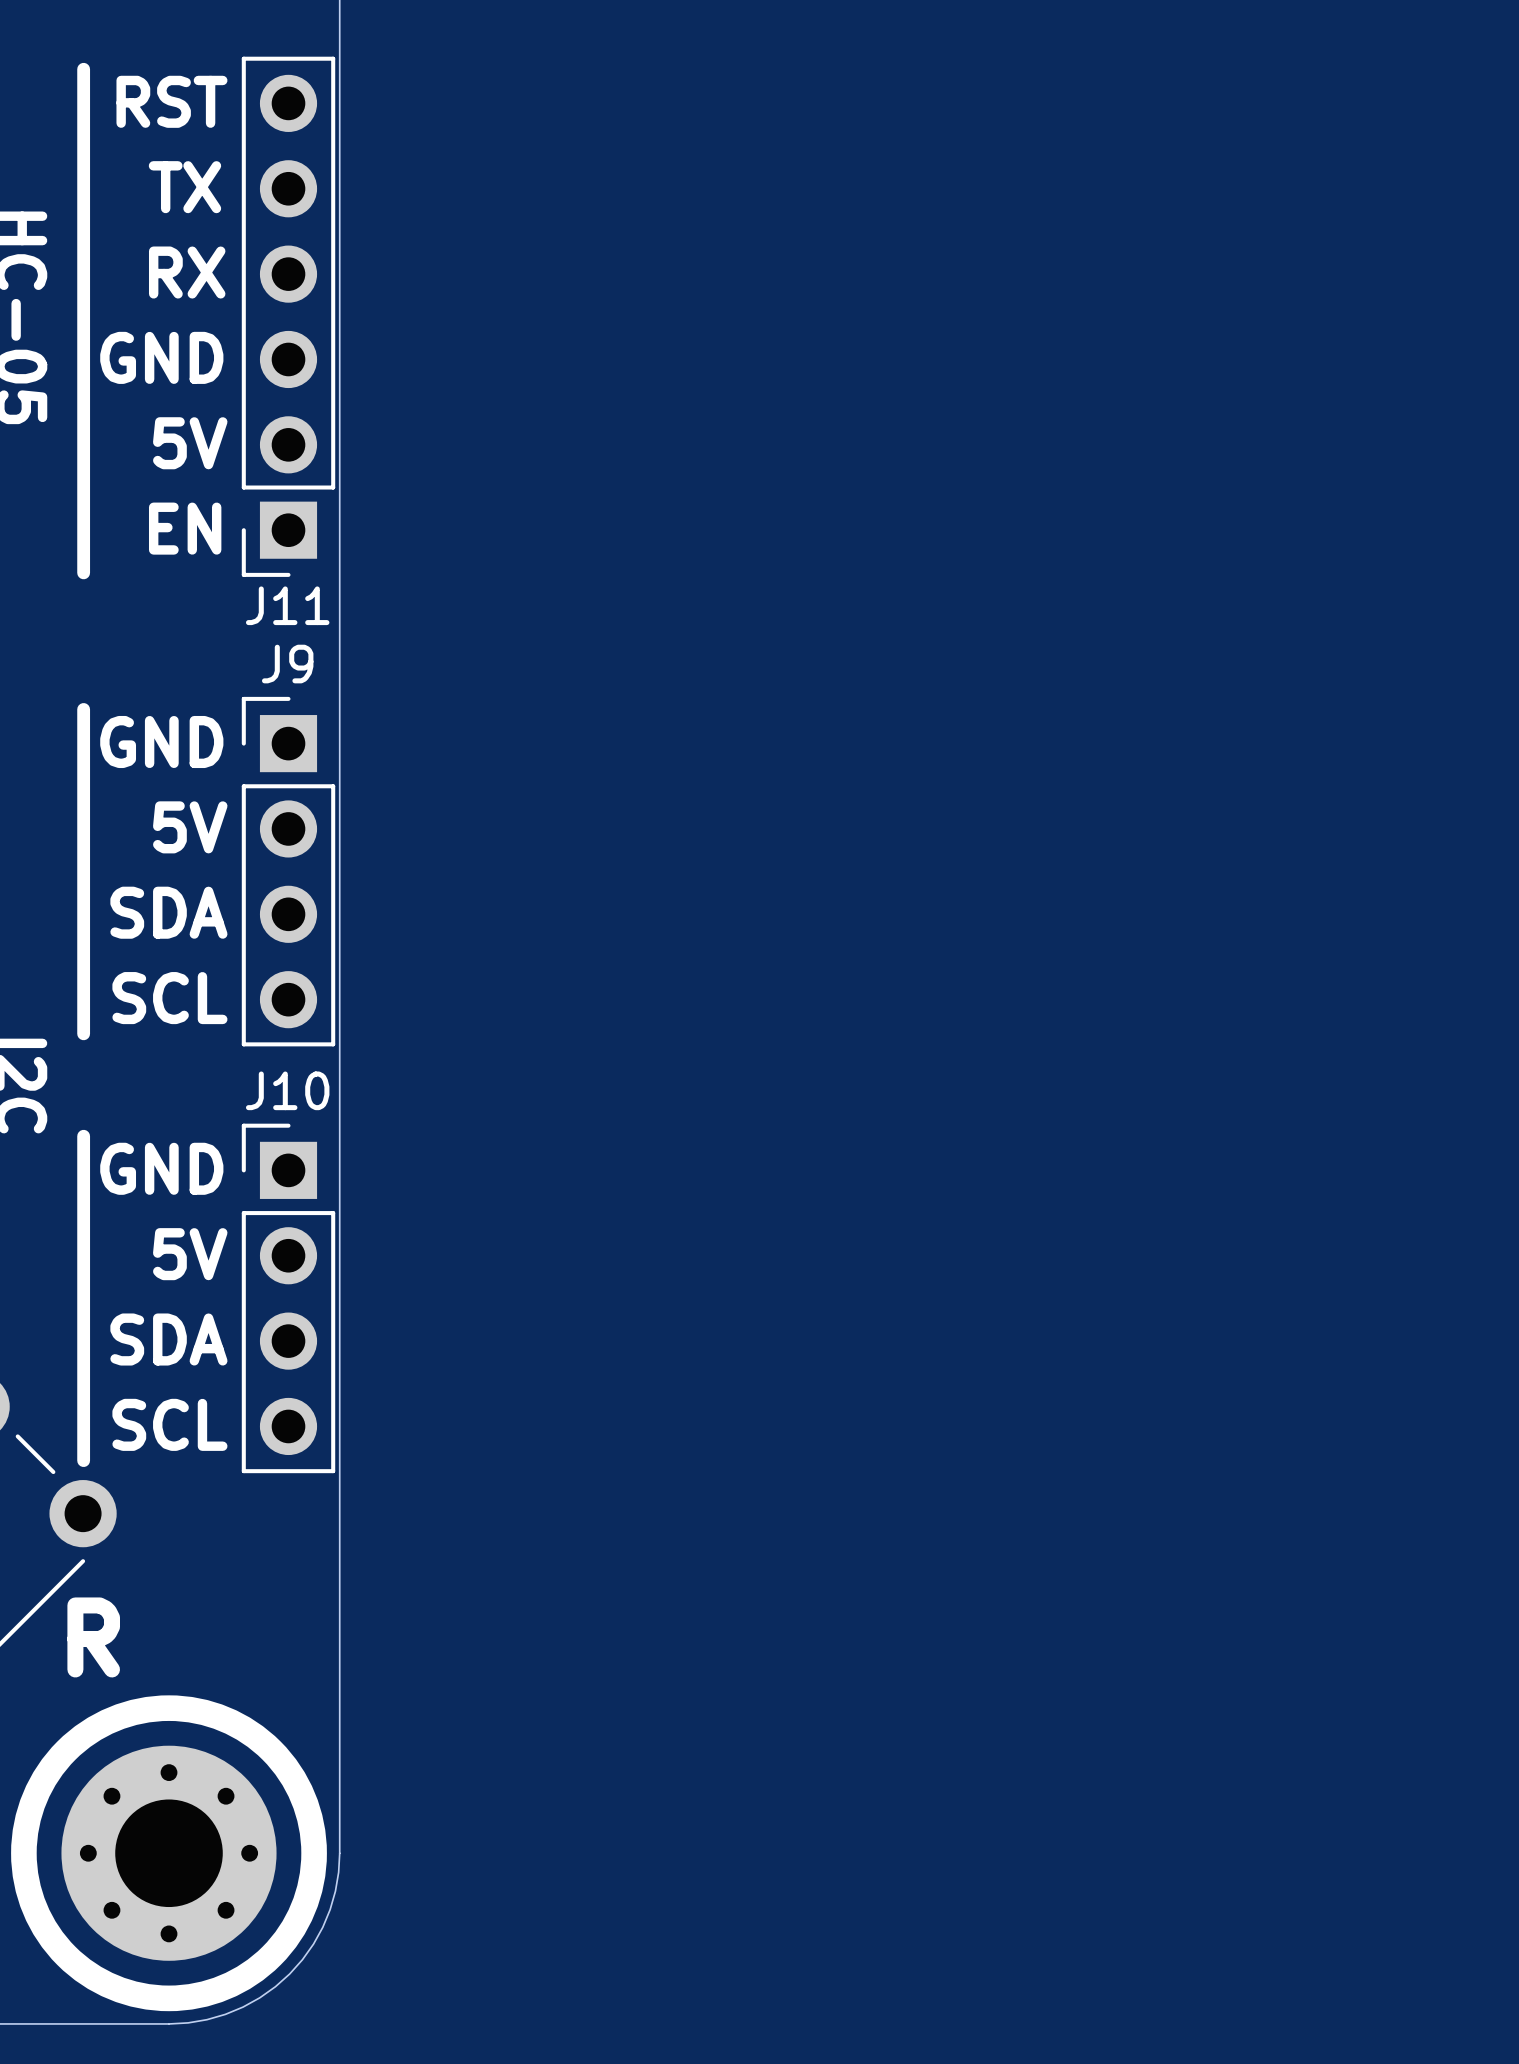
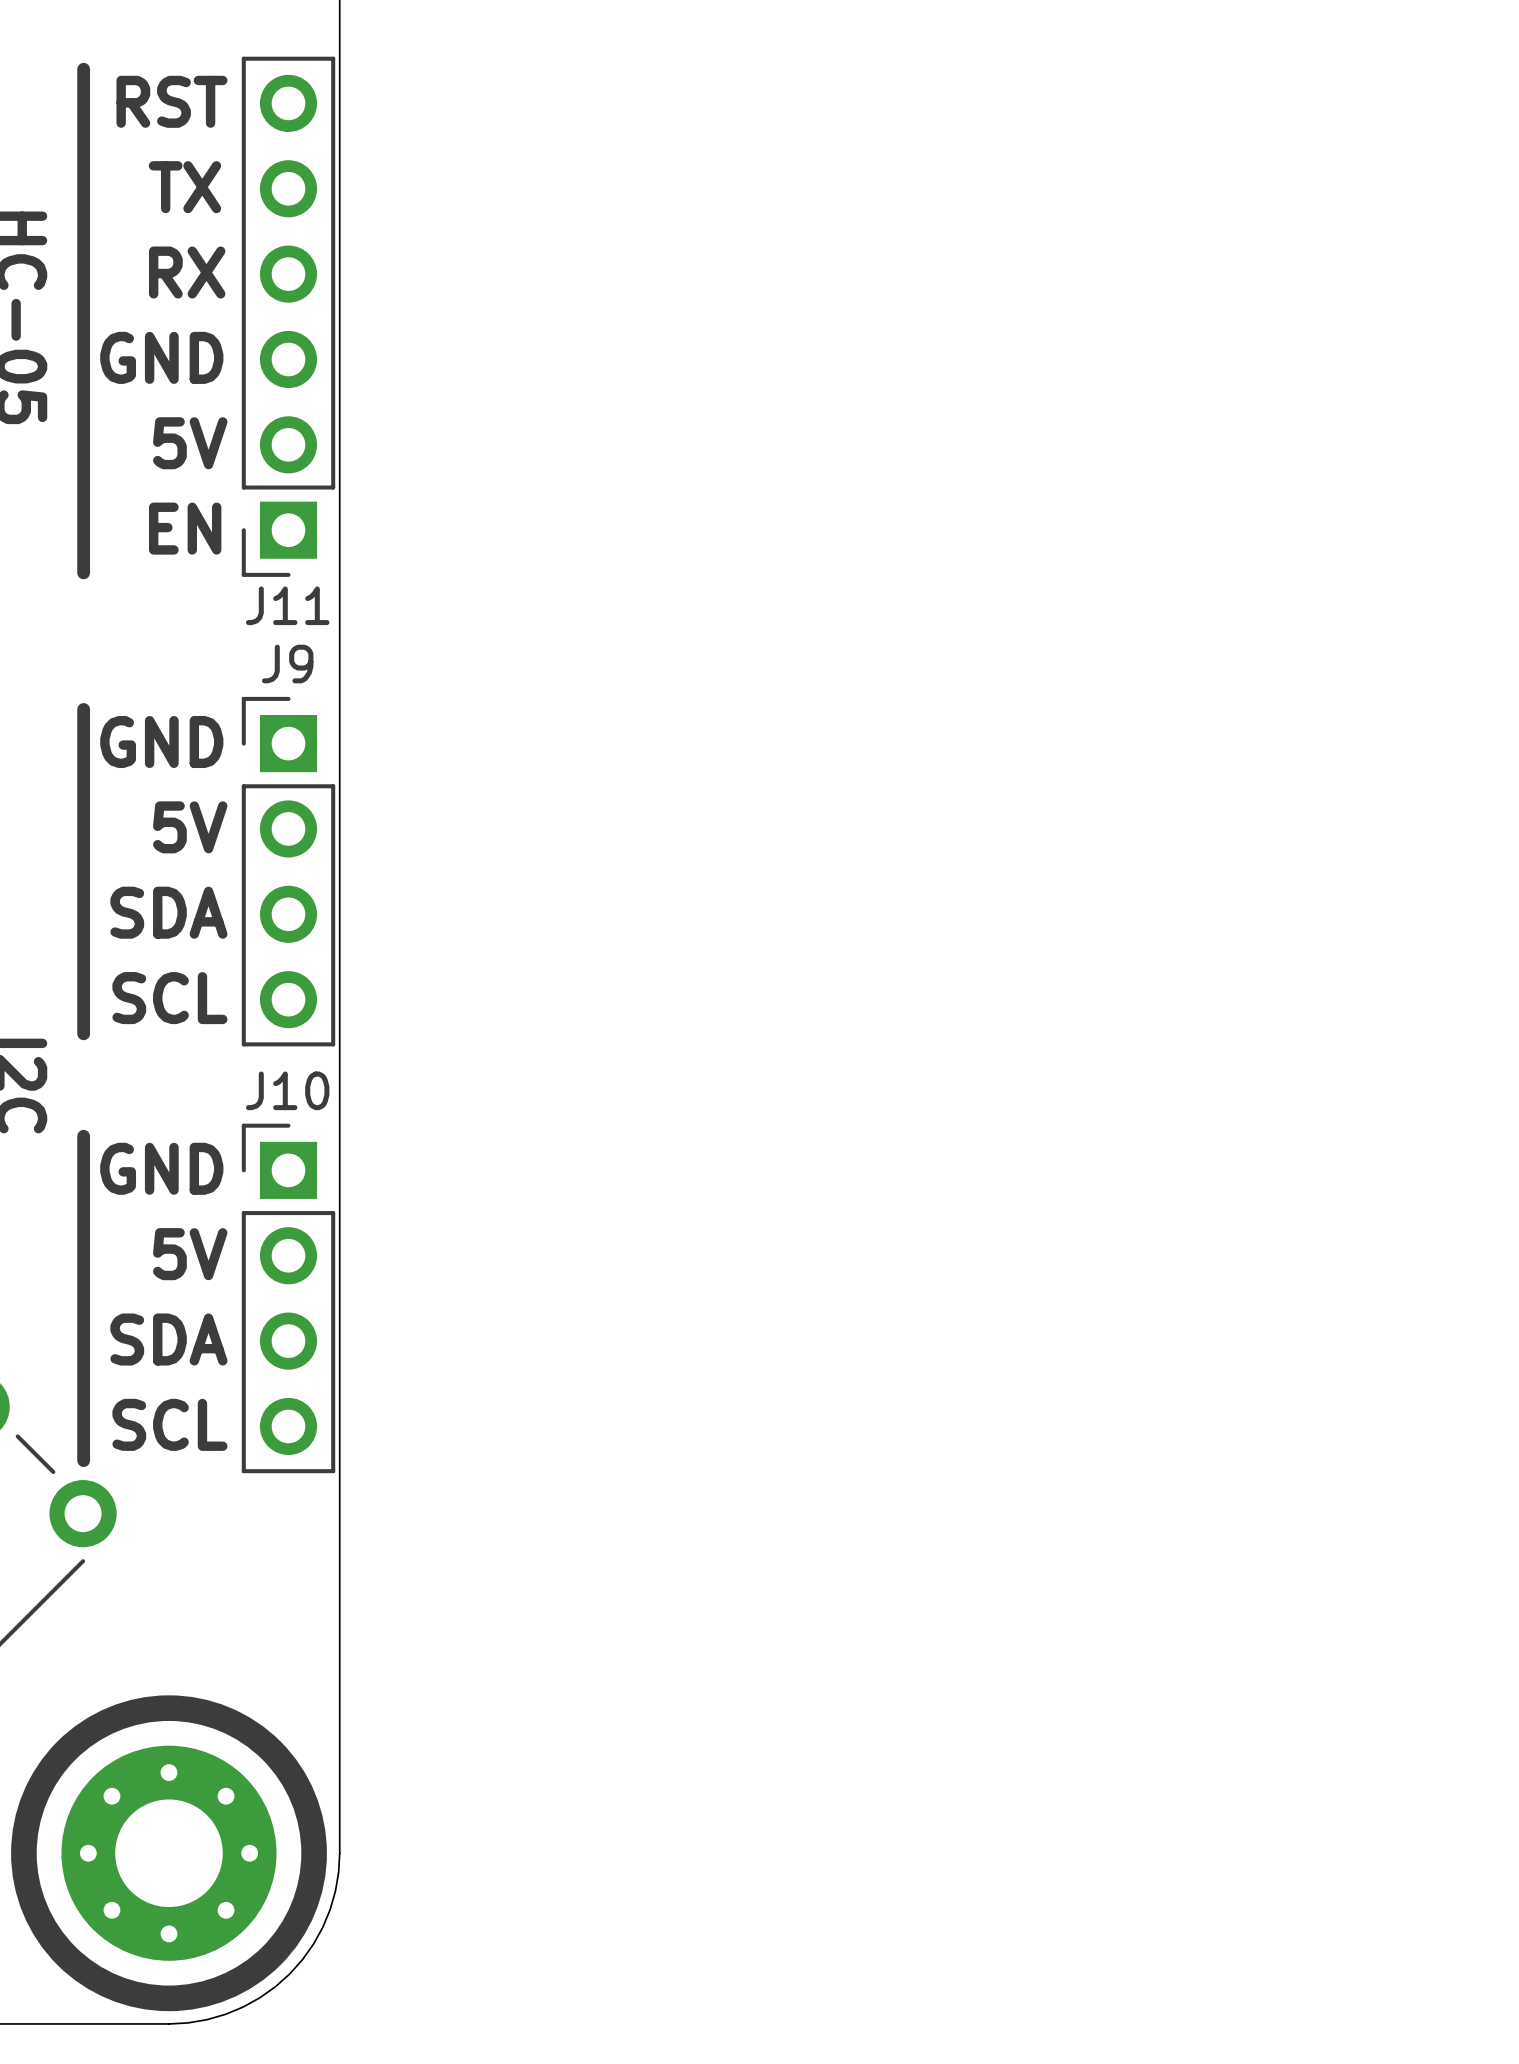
text: R (93, 1637) -> none

